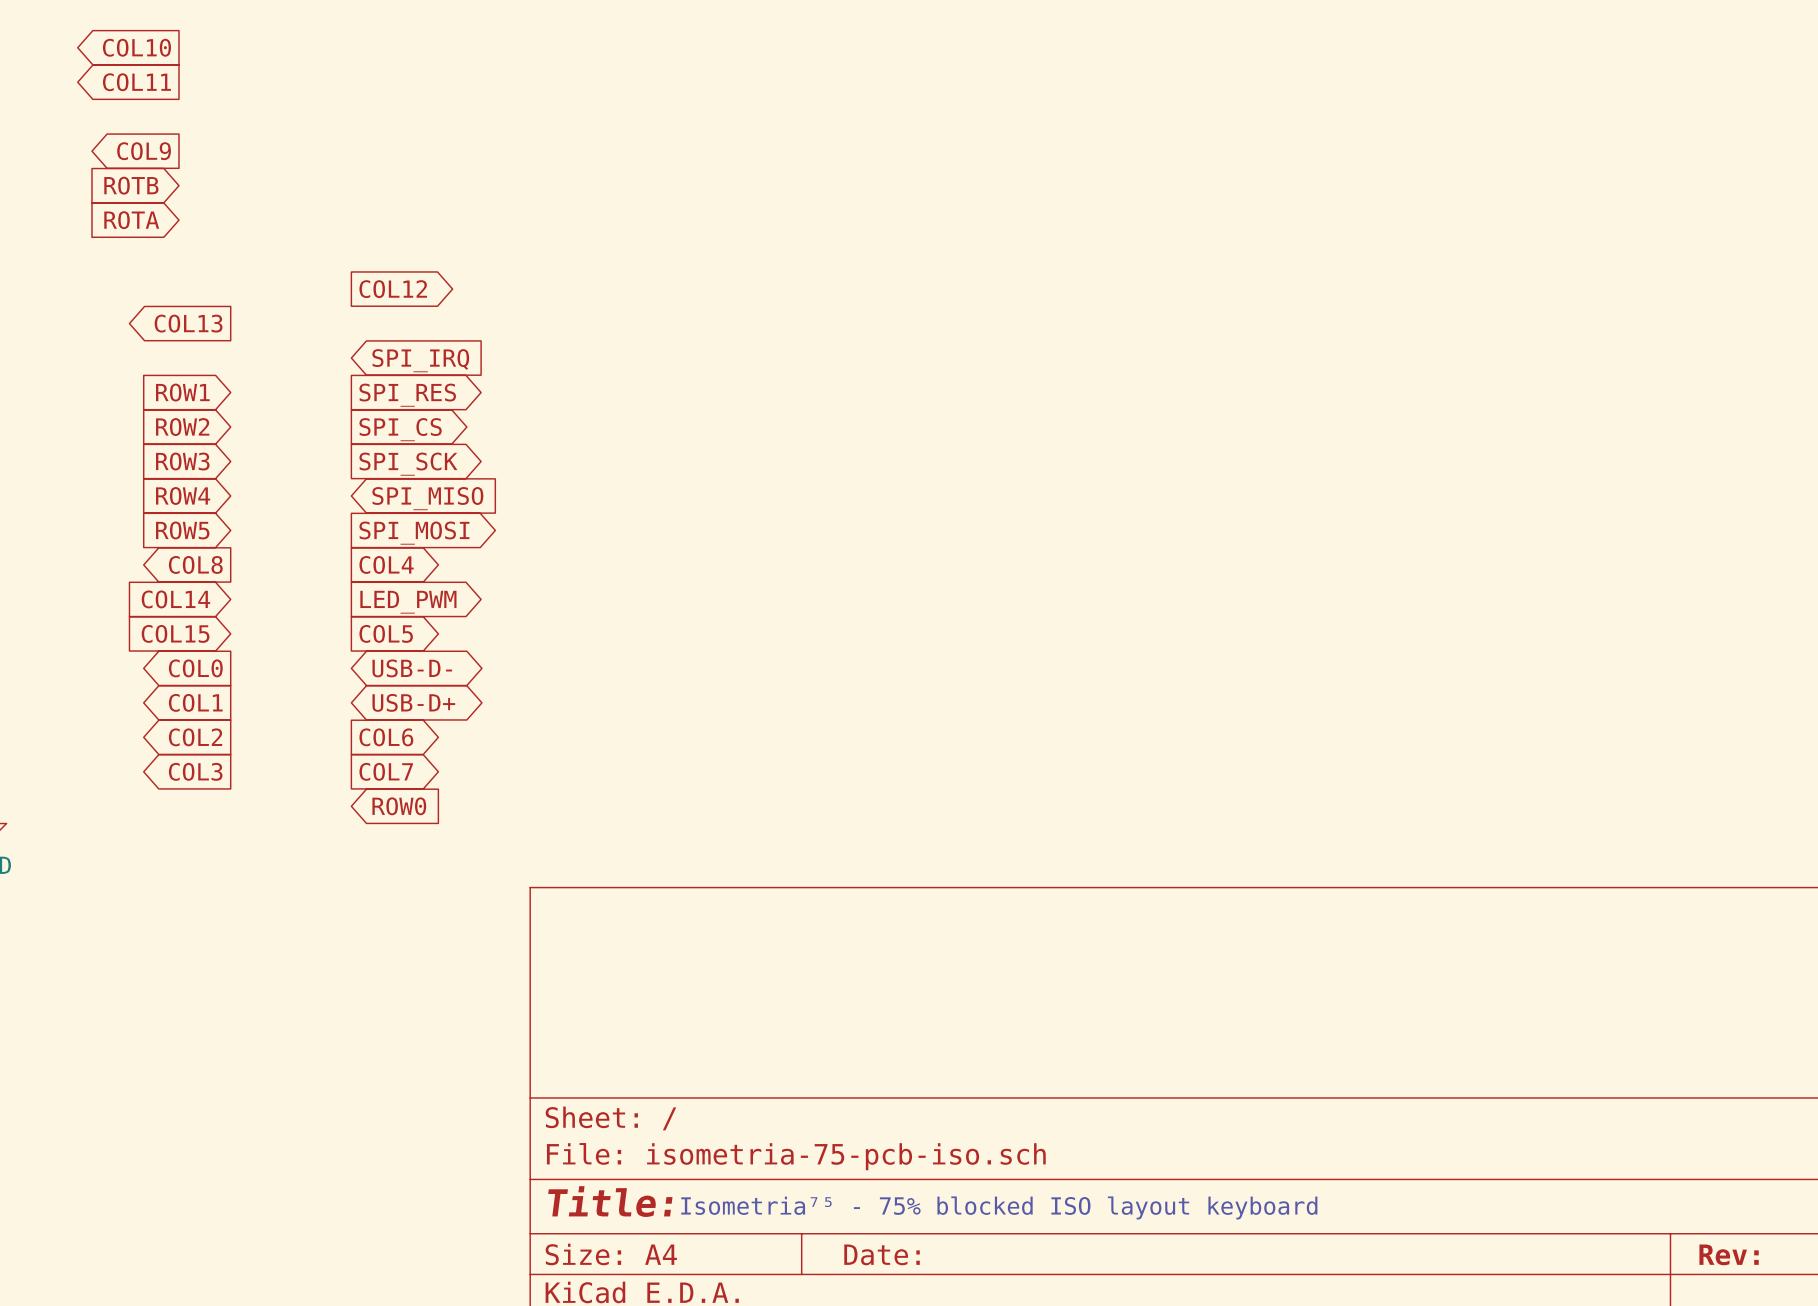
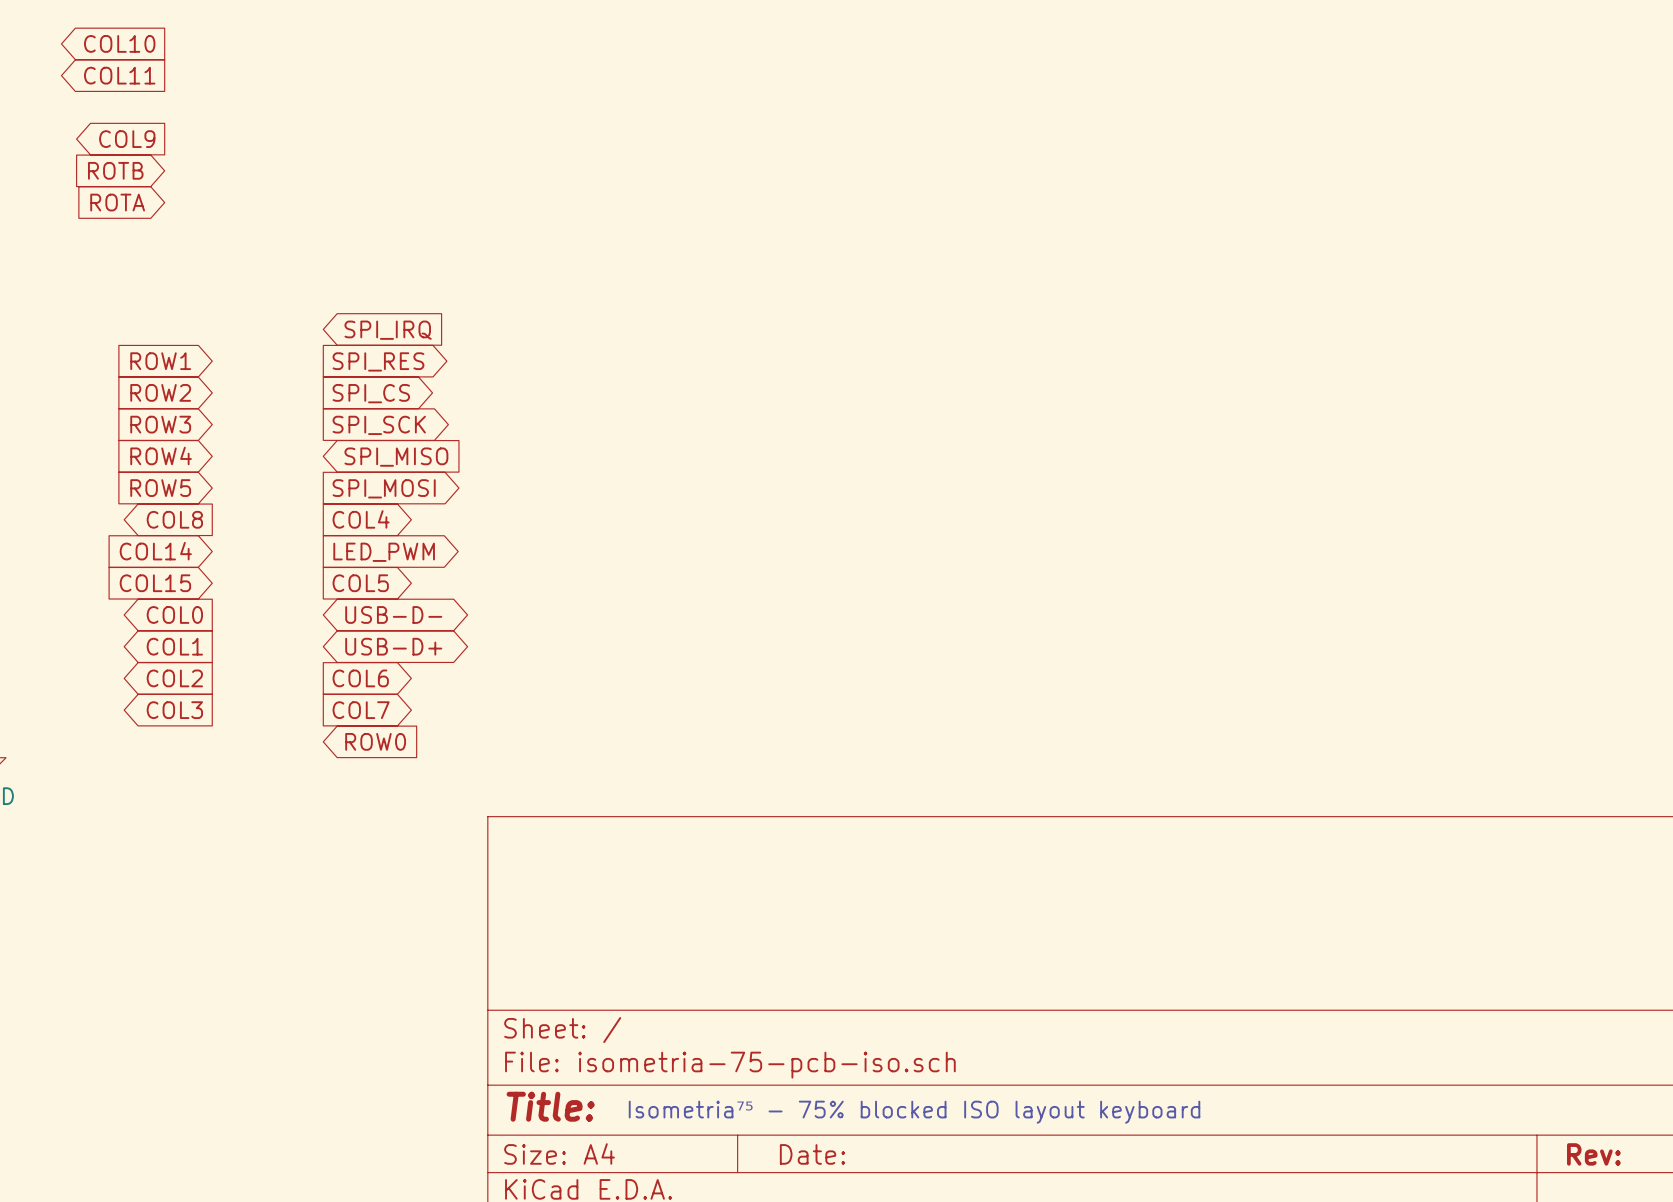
global label: COL12 (393, 289) -> none
global label: COL13 (188, 323) -> none

